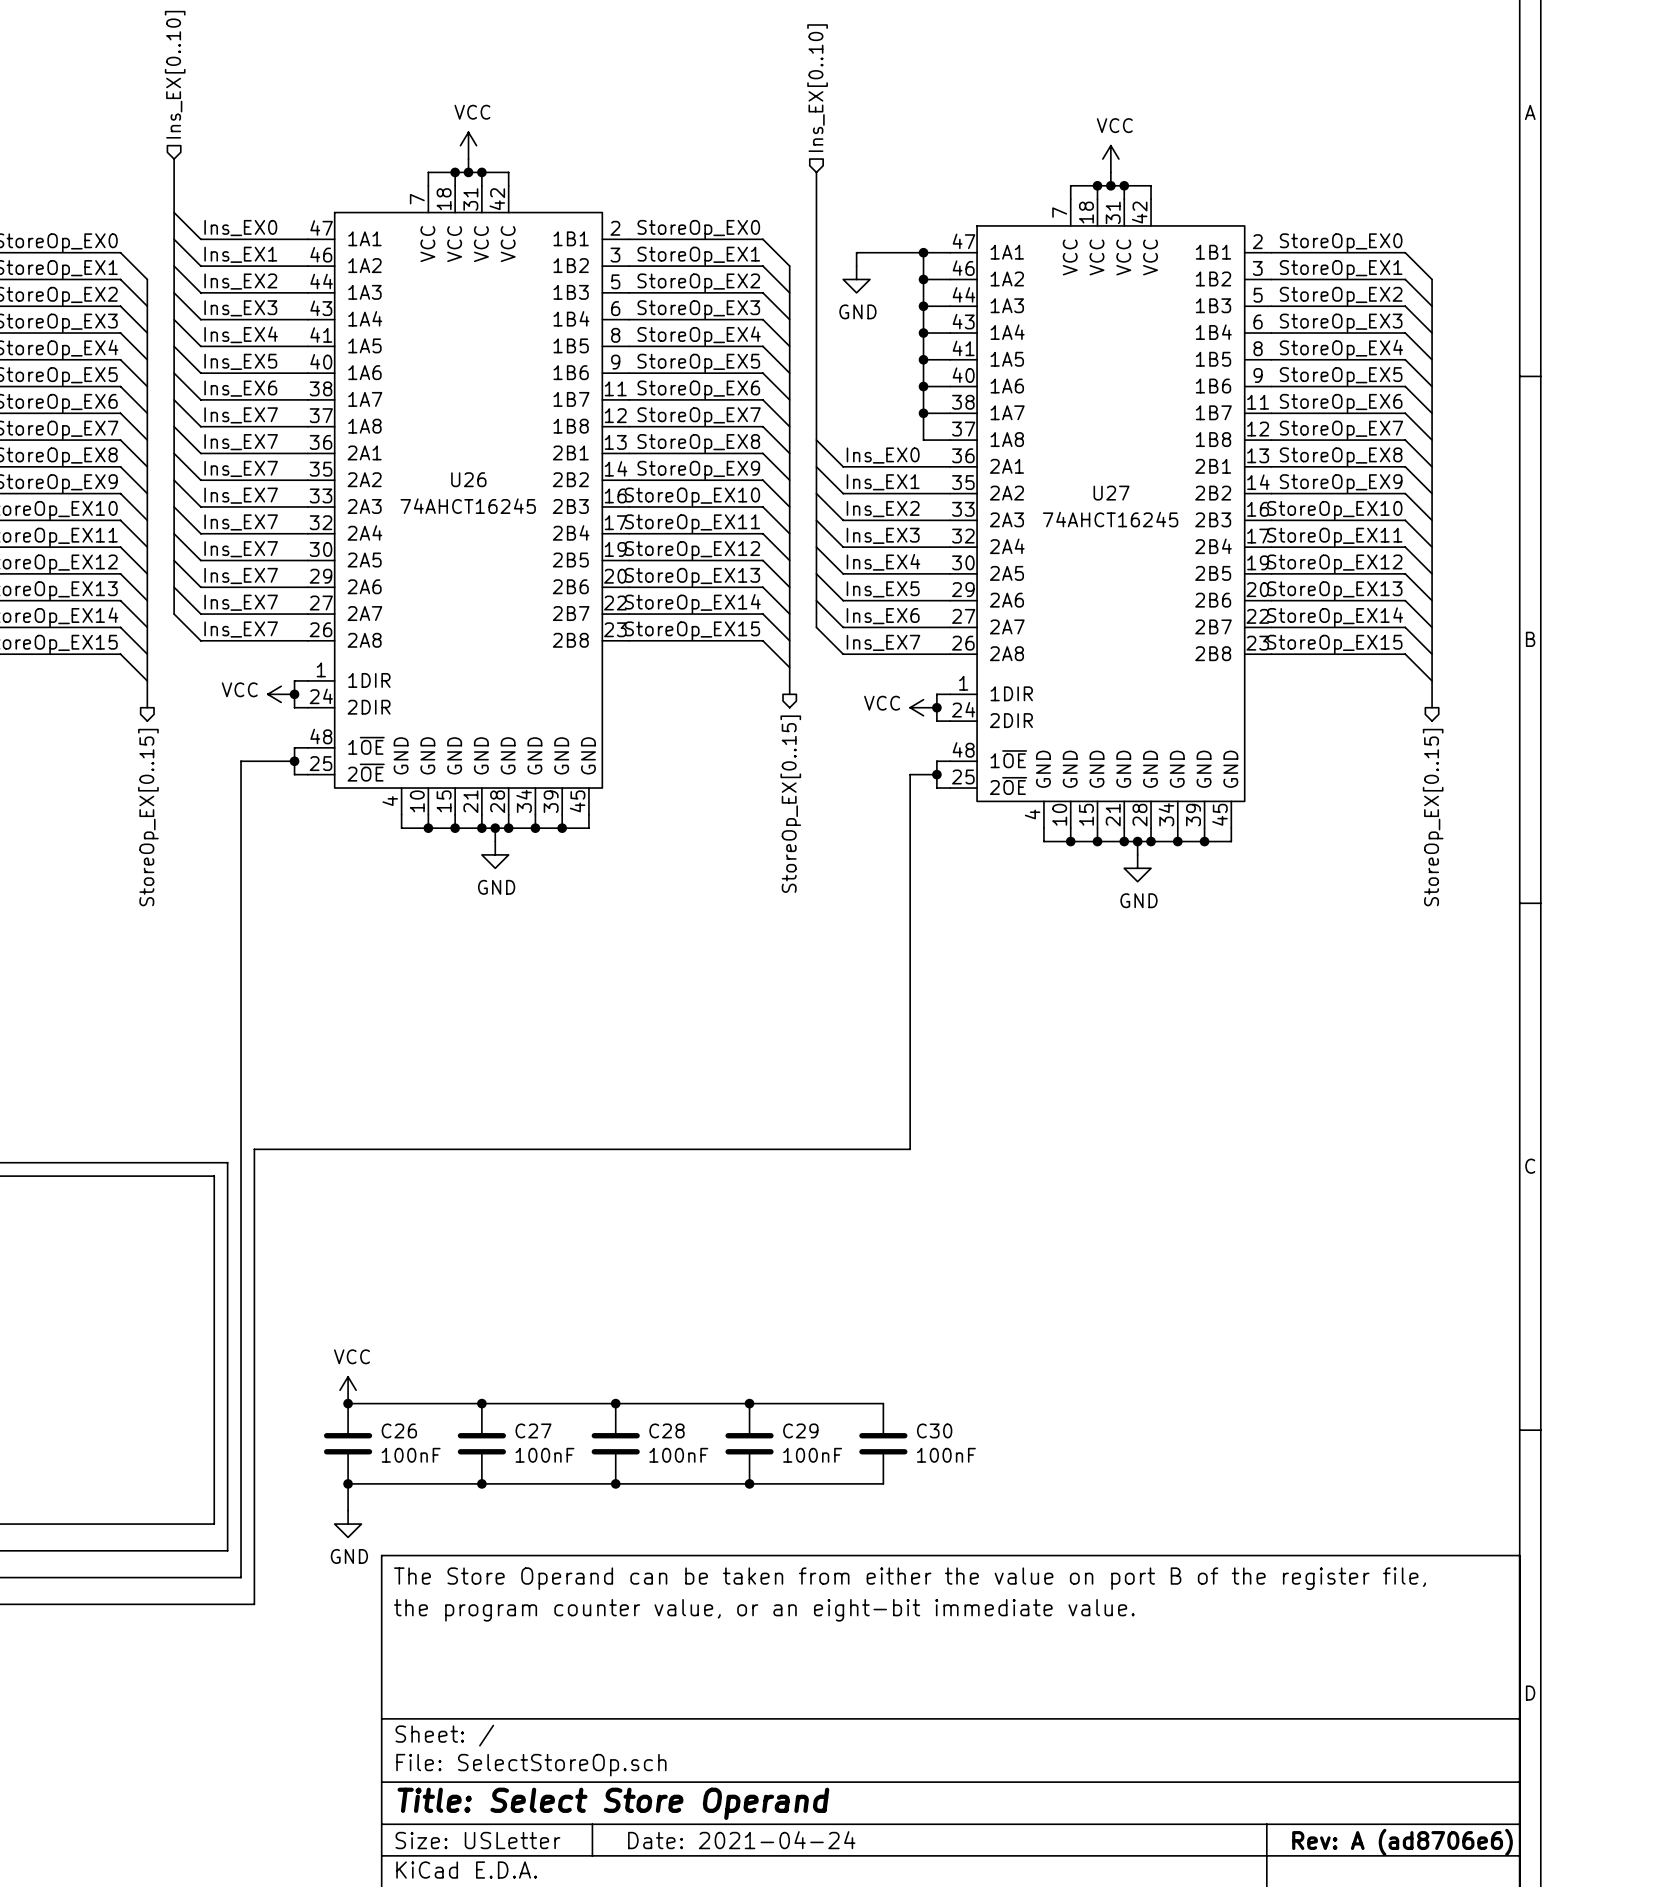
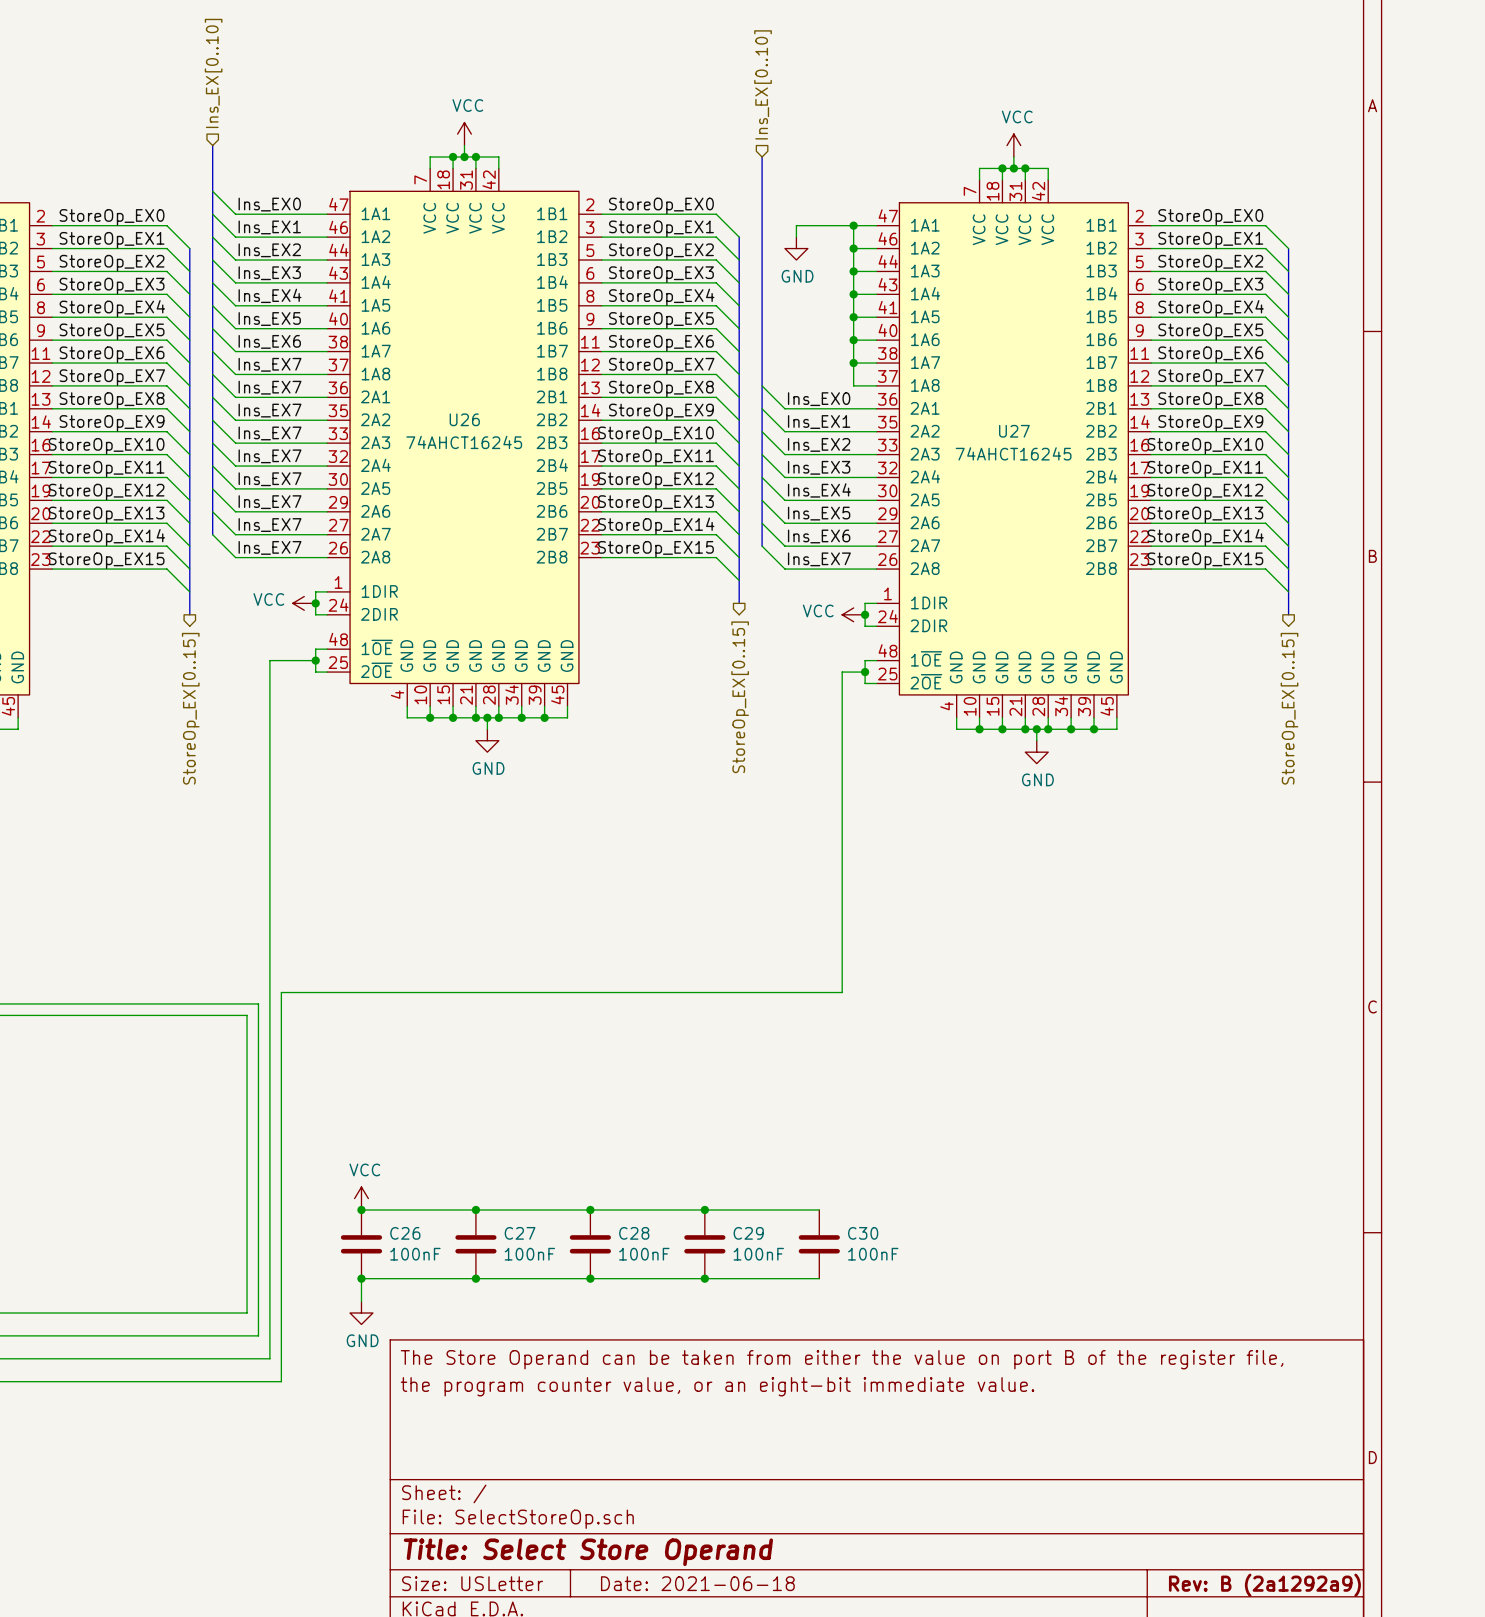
title block: Date: 2021-04-24 (741, 1840) -> Date: 2021-06-18 (697, 1583)
title block: Rev: A (ad8706e6) (1402, 1842) -> Rev: B (2a1292a9) (1264, 1585)

